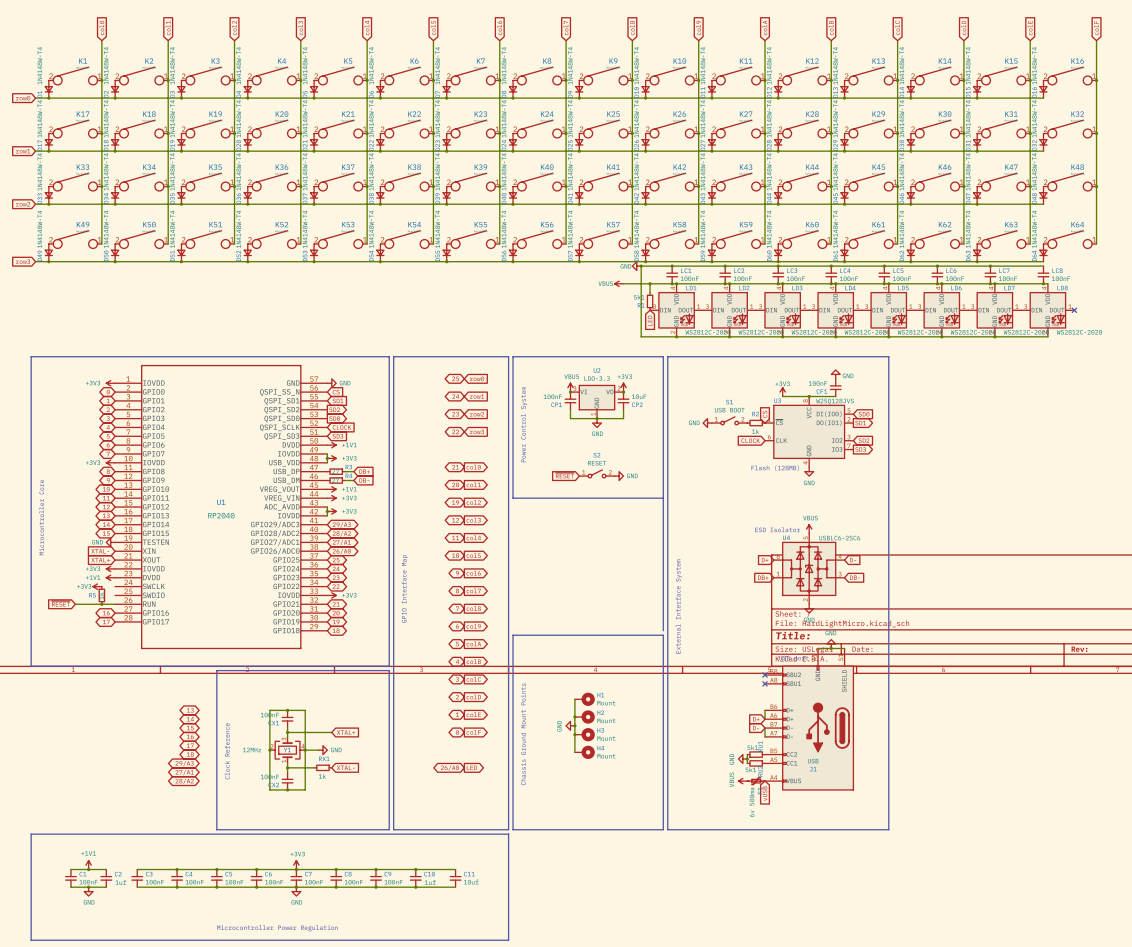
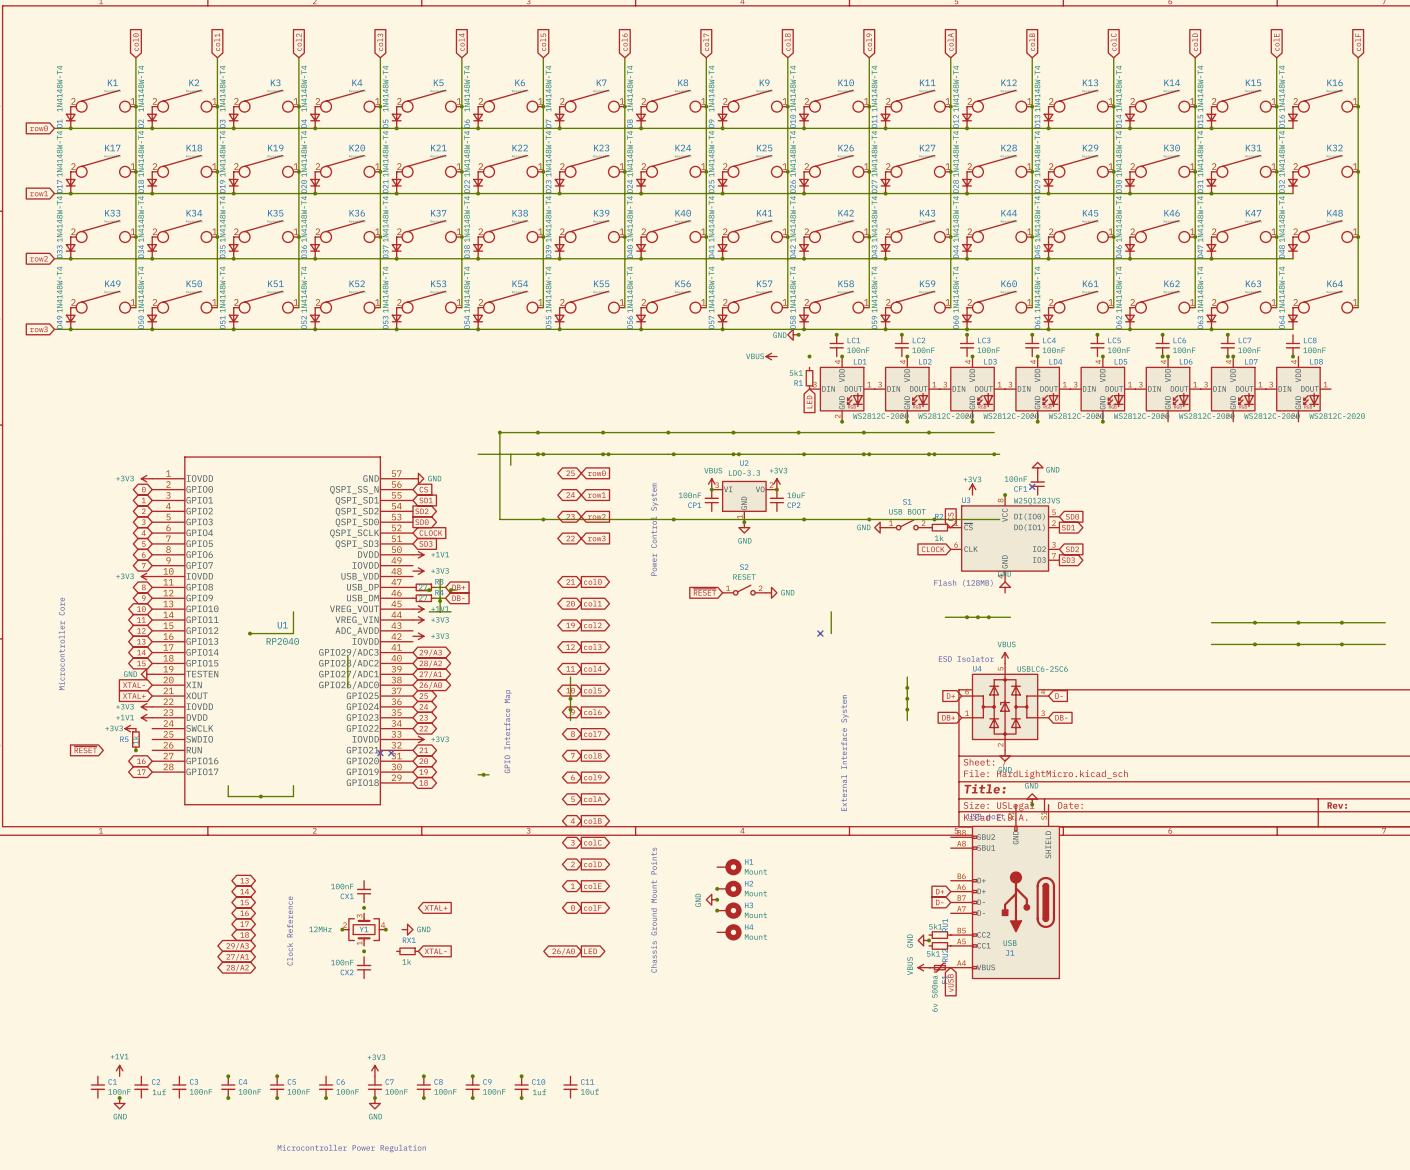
wire: (1043, 266) (641, 266) (641, 336) (1047, 336) -> none
wire: (623, 283) (1047, 283) -> none
wire: (650, 283) (650, 292) -> none
junction: (672, 283) -> none
junction: (725, 283) -> none
junction: (778, 283) -> none
junction: (831, 283) -> none
junction: (884, 283) -> none
no-connect mark: (1074, 310) -> none
junction: (941, 336) -> none
junction: (994, 336) -> none
junction: none -> (499, 432)
junction: none -> (537, 432)
junction: none -> (603, 432)
junction: none -> (668, 432)
junction: none -> (733, 432)
junction: none -> (798, 432)
junction: none -> (863, 432)
junction: none -> (929, 432)
wire: none -> (994, 432) (499, 432) (499, 519) (999, 519)
line: (31, 356) (389, 356) (389, 666) (31, 666) (31, 356) -> none
line: (393, 356) (508, 356) (508, 829) (393, 829) (393, 356) -> none
line: (667, 356) (888, 356) (888, 829) (667, 829) (667, 356) -> none
wire: none -> (478, 454) (999, 454)
wire: none -> (510, 454) (510, 465)
junction: none -> (537, 454)
junction: none -> (543, 454)
junction: none -> (603, 454)
junction: none -> (608, 454)
junction: none -> (673, 454)
junction: none -> (733, 454)
junction: none -> (738, 454)
junction: none -> (804, 454)
junction: none -> (863, 454)
junction: none -> (869, 454)
junction: none -> (929, 454)
junction: none -> (934, 454)
junction: none -> (994, 454)
no-connect mark: none -> (1032, 486)
wire: (782, 396) (835, 396) -> none
wire: (570, 409) (570, 418) (623, 418) (623, 409) -> none
junction: none -> (543, 519)
junction: none -> (673, 519)
junction: none -> (804, 519)
junction: none -> (869, 519)
junction: none -> (934, 519)
wire: (327, 453) (327, 462) -> none
junction: (327, 458) -> none
wire: none -> (440, 579) (440, 611)
power symbol rotation: 0° (809, 471) -> 180° (1005, 587)
junction: none -> (429, 590)
wire: none -> (451, 590) (456, 590)
junction: none -> (451, 590)
junction: none -> (440, 600)
wire: none -> (293, 611) (293, 633) (250, 633)
wire: none -> (429, 611) (451, 611)
wire: none -> (945, 617) (1010, 617)
junction: none -> (967, 617)
junction: none -> (977, 617)
junction: none -> (988, 617)
line: (663, 498) (513, 498) (513, 356) (663, 356) (663, 630) -> none
wire: none -> (1211, 622) (1385, 622)
junction: none -> (1254, 622)
junction: none -> (1298, 622)
junction: none -> (1341, 622)
wire: (327, 507) (327, 515) -> none
junction: none -> (250, 633)
no-connect mark: none -> (820, 633)
junction: (327, 511) -> none
wire: none -> (1211, 644) (1385, 644)
junction: none -> (1254, 644)
junction: none -> (1298, 644)
junction: none -> (1341, 644)
wire: none -> (347, 655) (347, 687)
wire: none -> (570, 677) (570, 720)
wire: none -> (907, 677) (907, 720)
junction: none -> (907, 687)
junction: none -> (570, 698)
junction: none -> (907, 698)
junction: none -> (570, 709)
junction: none -> (907, 709)
wire: (75, 604) (115, 604) -> none
no-connect mark: none -> (380, 753)
no-connect mark: none -> (391, 753)
wire: none -> (478, 774) (489, 774)
junction: none -> (483, 774)
wire: none -> (228, 785) (228, 796) (293, 796) (293, 785)
line: (513, 635) (513, 829) (663, 829) (663, 635) (513, 635) -> none
junction: none -> (260, 796)
wire: (818, 648) (844, 648) -> none
line: (216, 670) (389, 670) (389, 829) (216, 829) (216, 670) -> none
no-connect mark: (764, 675) -> none
no-connect mark: (764, 683) -> none
wire: (574, 699) (574, 752) -> none
wire: (269, 710) (269, 789) (305, 789) (305, 710) (269, 710) -> none
junction: (287, 710) -> none
wire: (764, 710) (764, 719) -> none
wire: (287, 728) (287, 736) -> none
wire: (764, 728) (764, 736) -> none
wire: (287, 732) (331, 732) -> none
wire: (305, 750) (318, 750) -> none
wire: (747, 754) (747, 763) -> none
wire: (287, 763) (287, 772) -> none
wire: (287, 767) (314, 767) -> none
junction: (287, 789) -> none
line: (31, 834) (508, 834) (508, 940) (31, 940) (31, 834) -> none
wire: (70, 869) (106, 869) -> none
junction: (88, 869) -> none
wire: (137, 869) (455, 869) -> none
junction: (256, 869) -> none
junction: (296, 869) -> none
wire: (70, 887) (106, 887) -> none
wire: (137, 887) (455, 887) -> none

